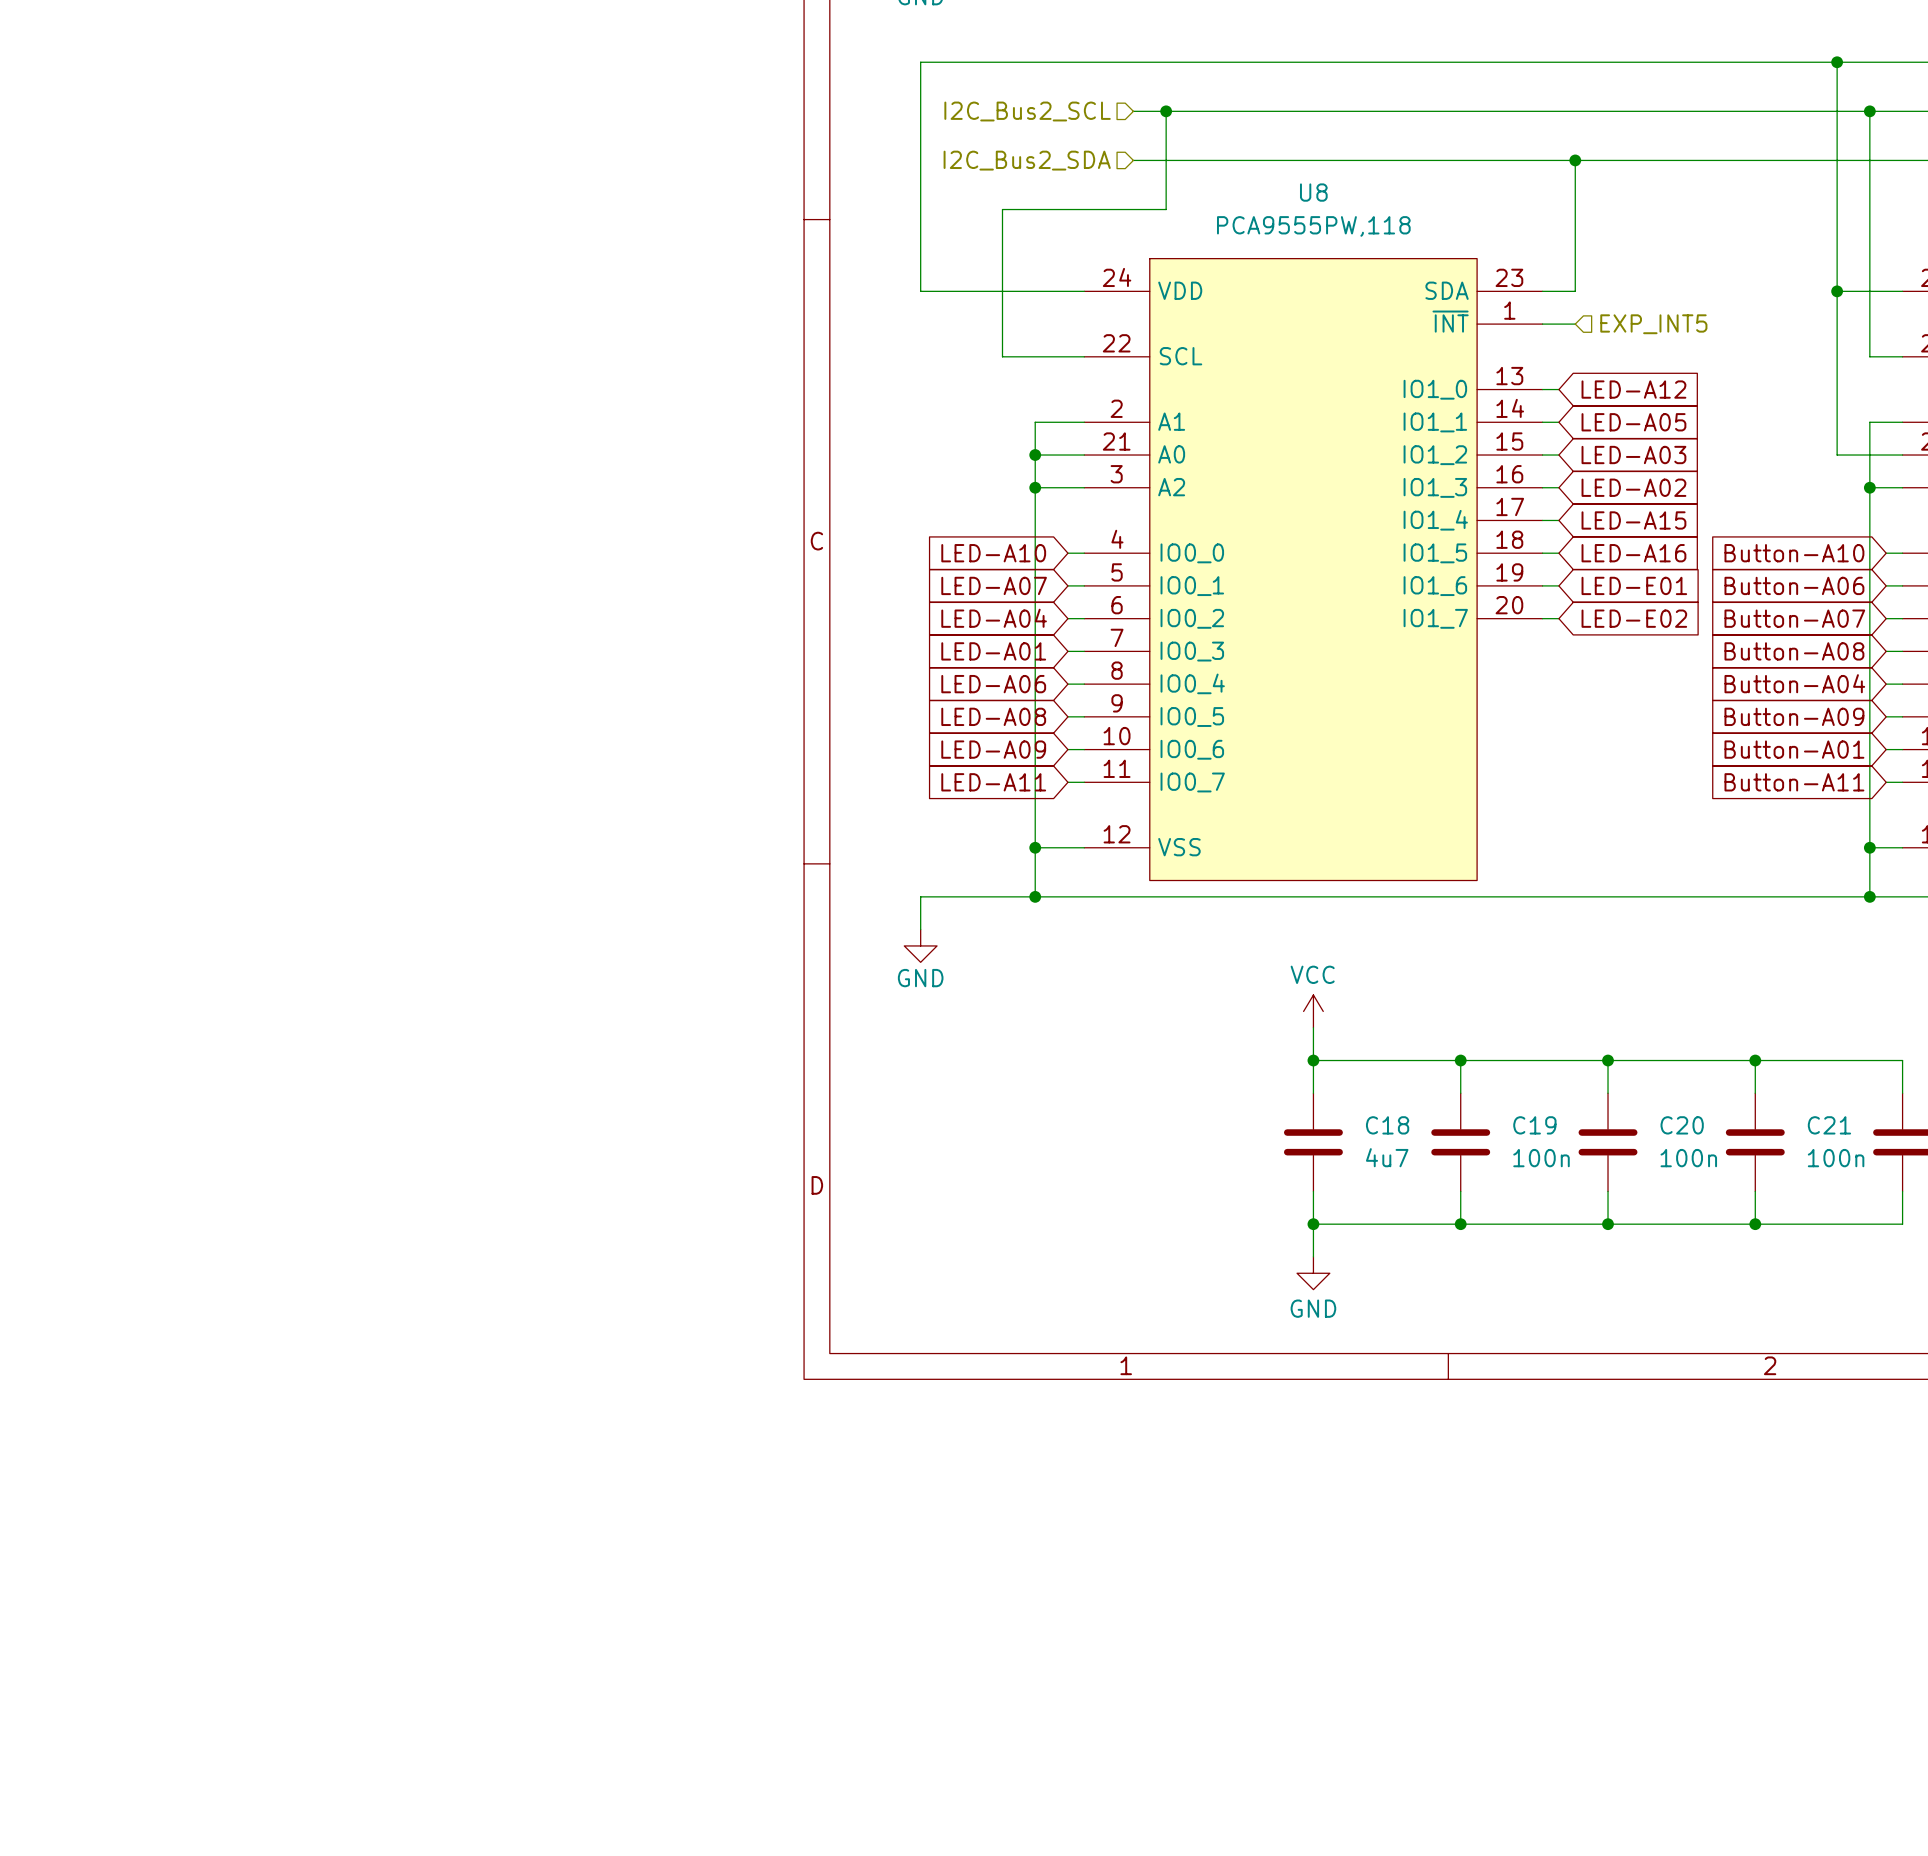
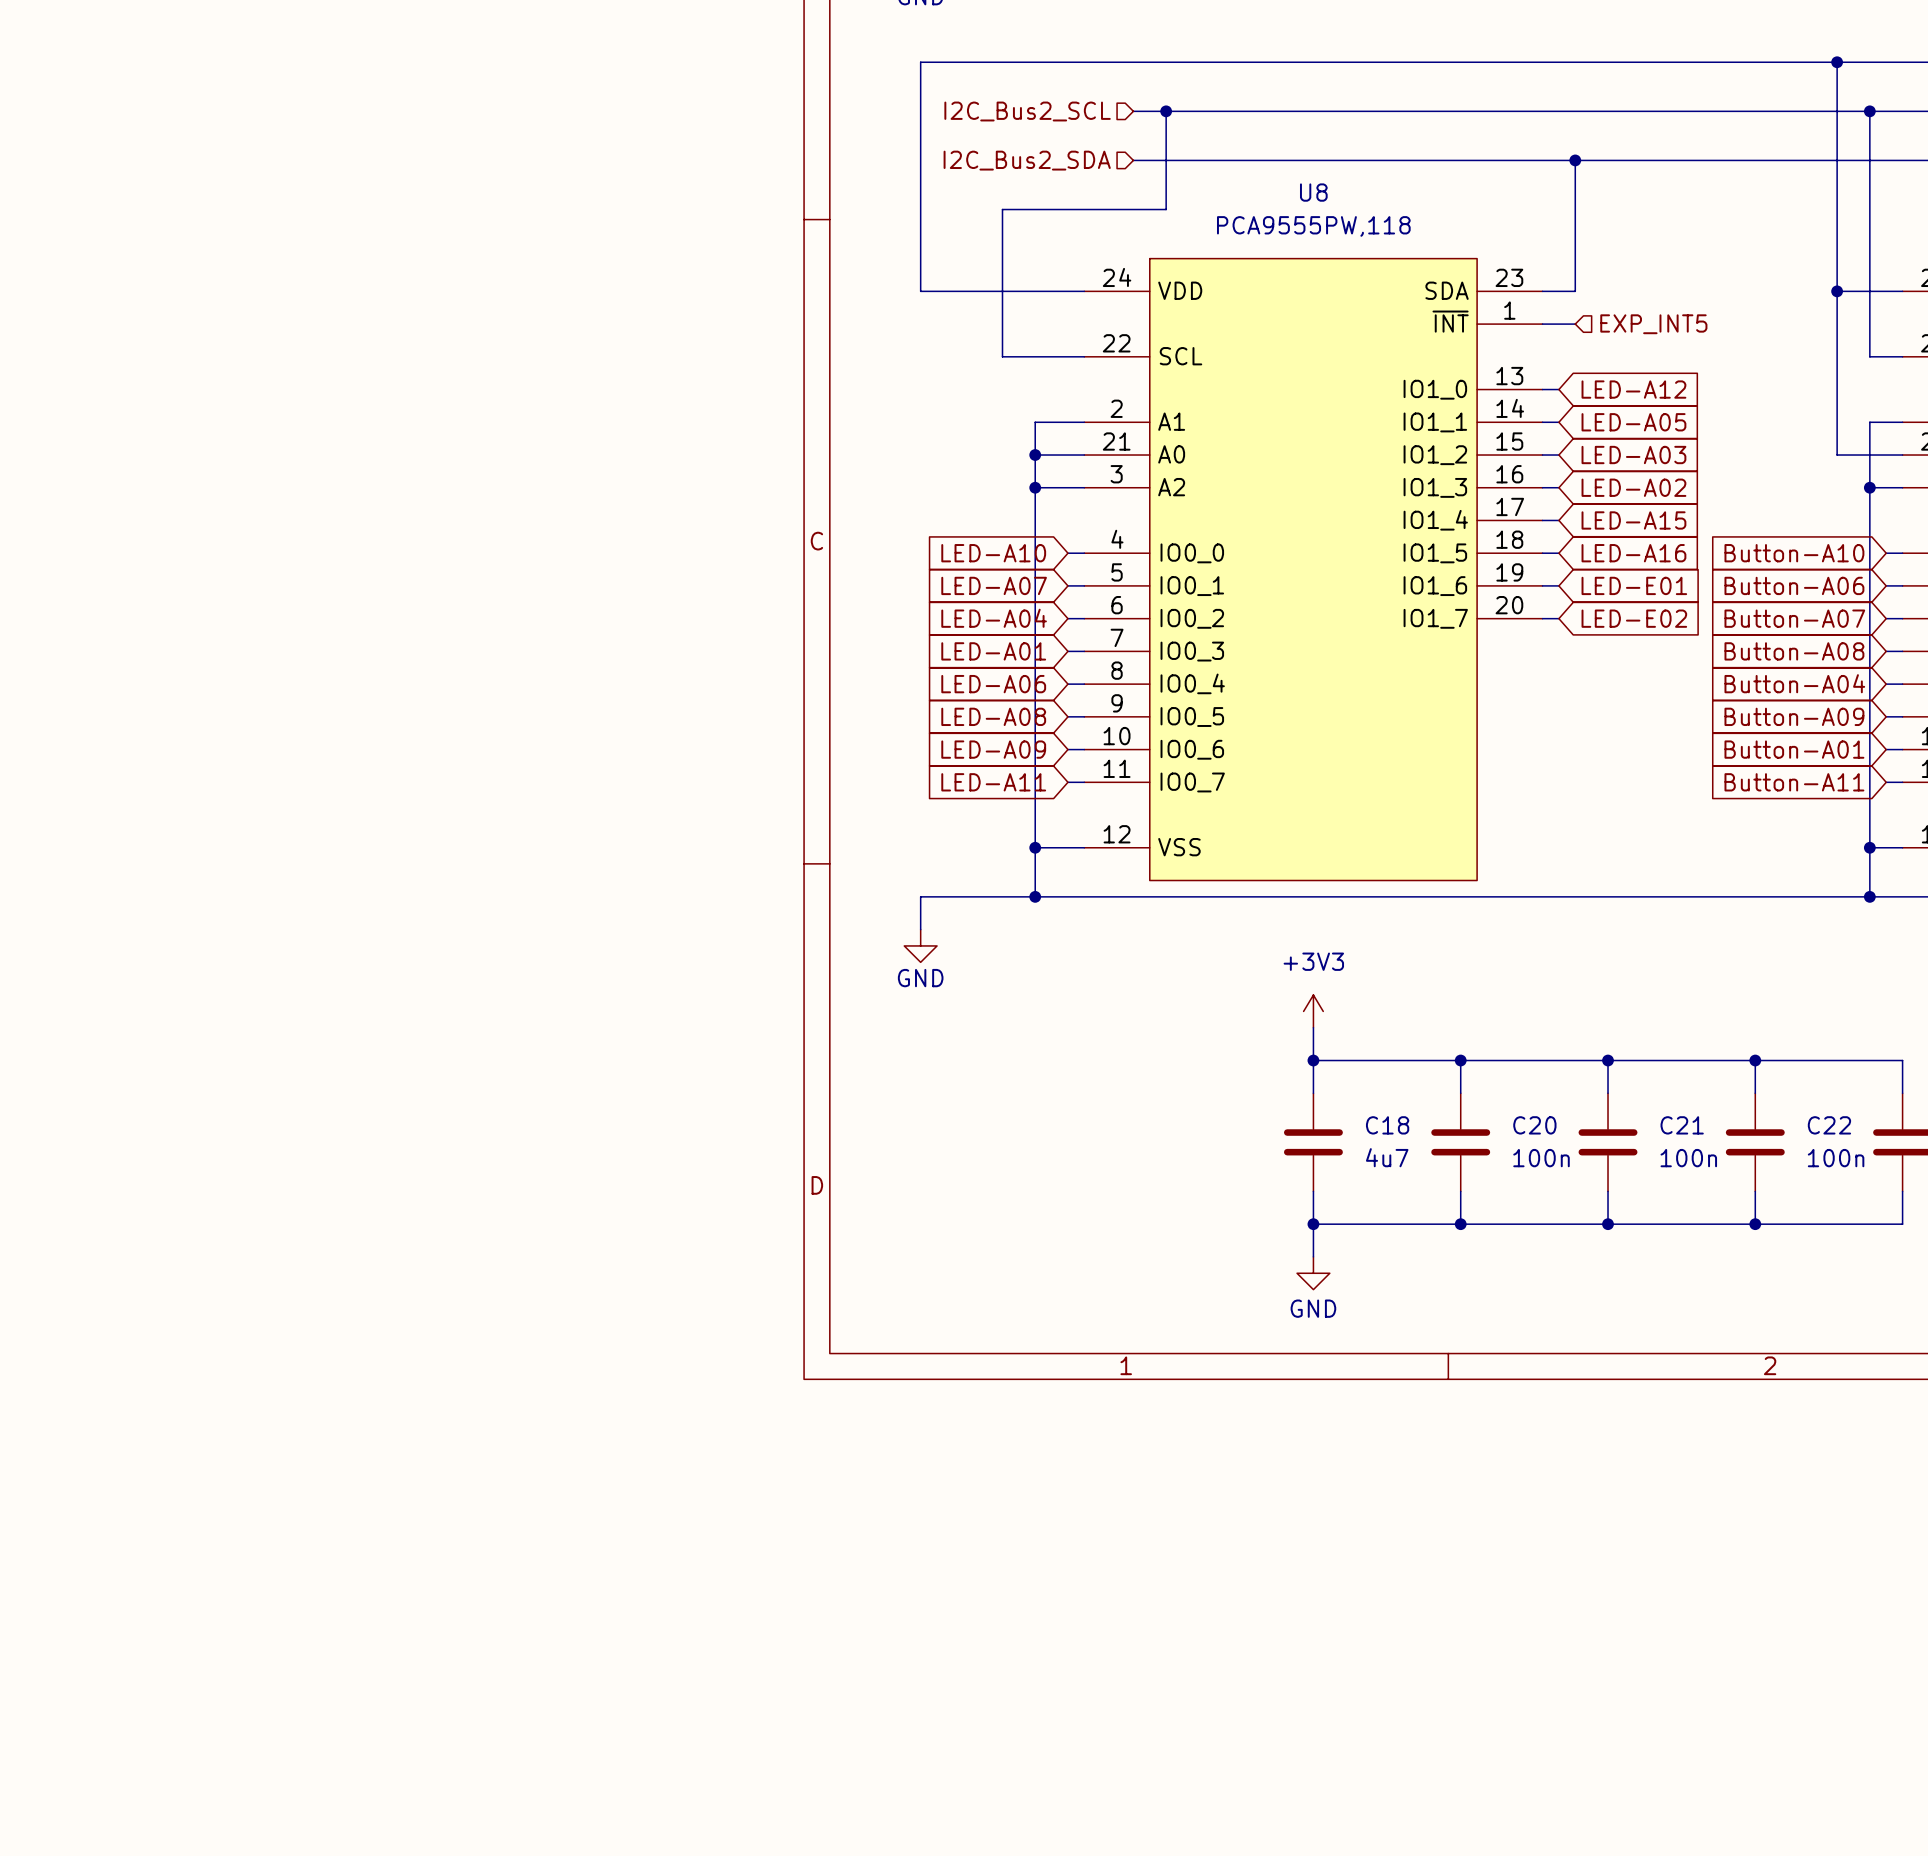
power symbol: VCC (1313, 1011) -> +3V3 (1313, 1011)
C19 name: C19 (1534, 1125) -> C20 (1534, 1125)
C20 name: C20 (1682, 1125) -> C21 (1682, 1125)
C21 name: C21 (1829, 1125) -> C22 (1829, 1125)

